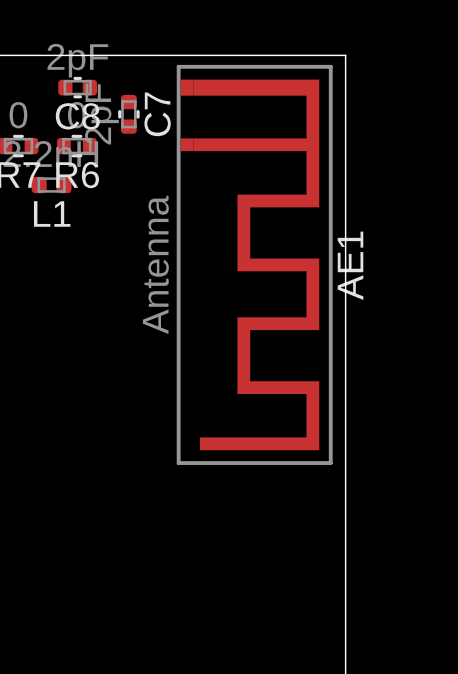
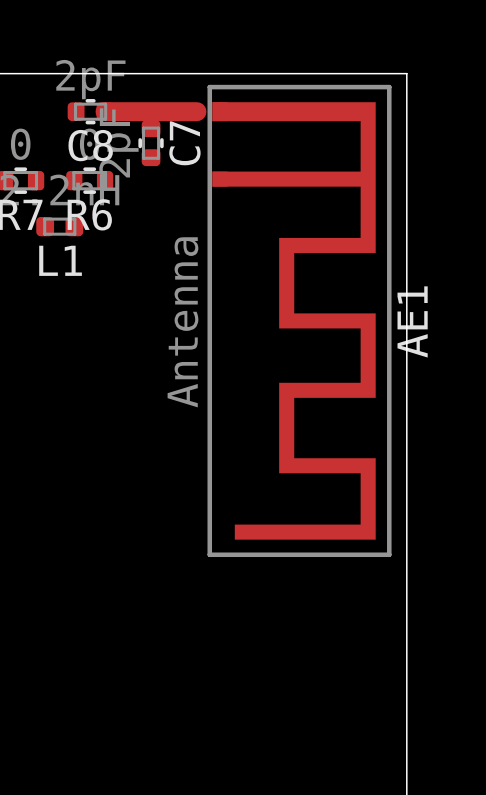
AE1 footprint: [176, 64, 333, 465] -> [207, 84, 392, 558]
top track: none -> (105, 111) (196, 111)

